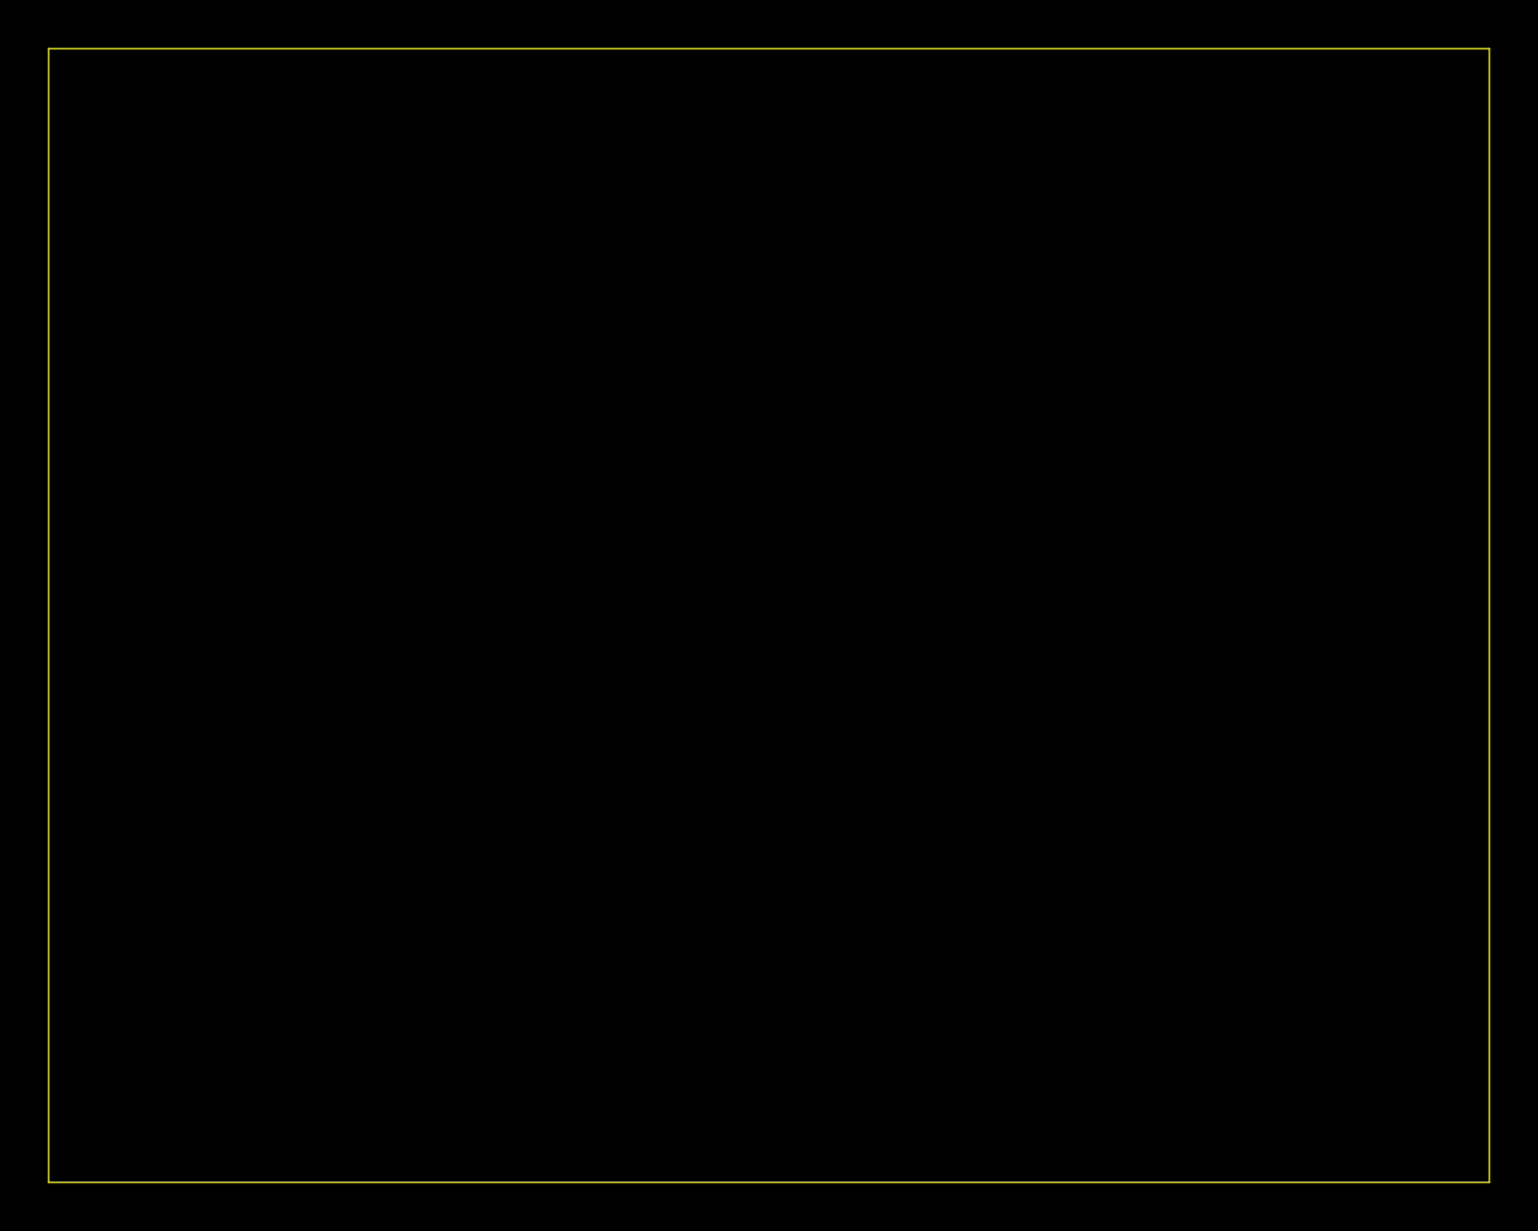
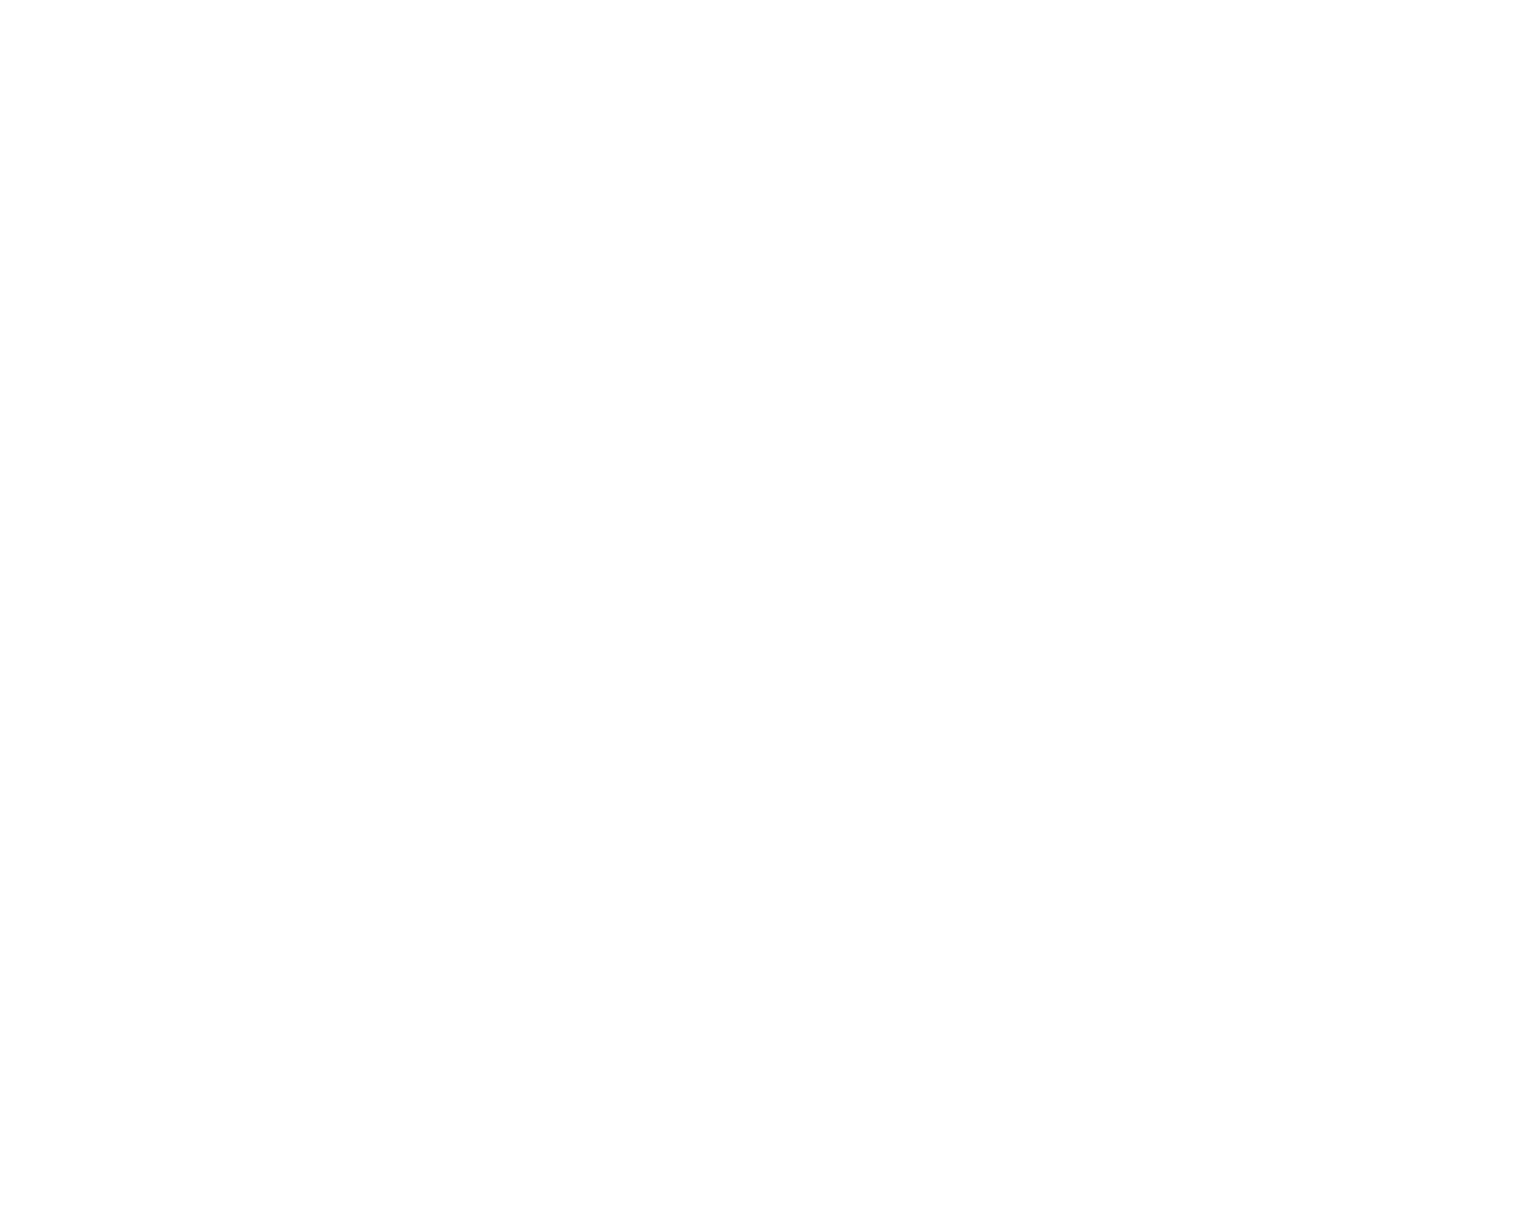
board edge: (1489, 48) (48, 48) (48, 1182) (1489, 1182) (1489, 48) -> none

